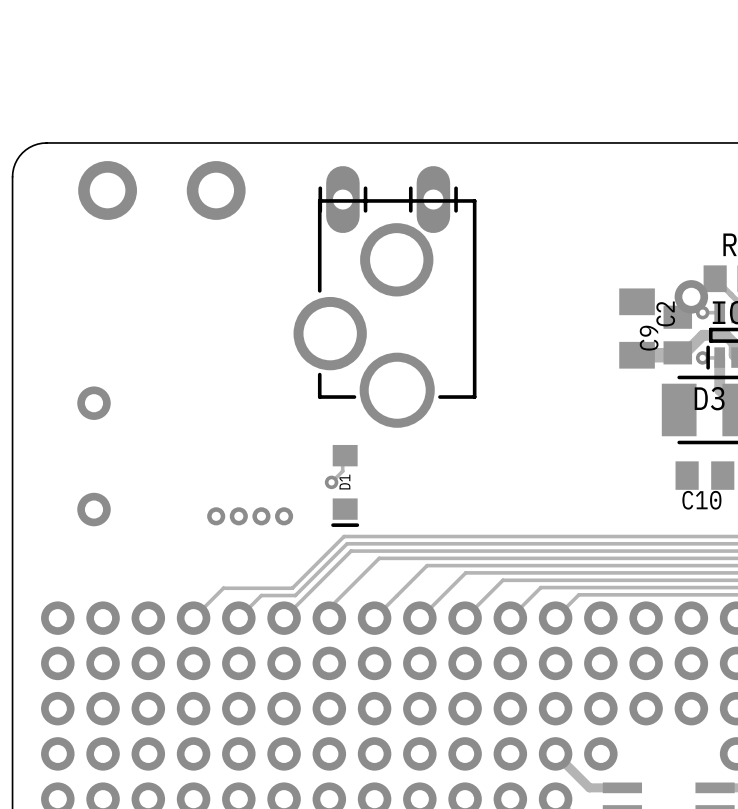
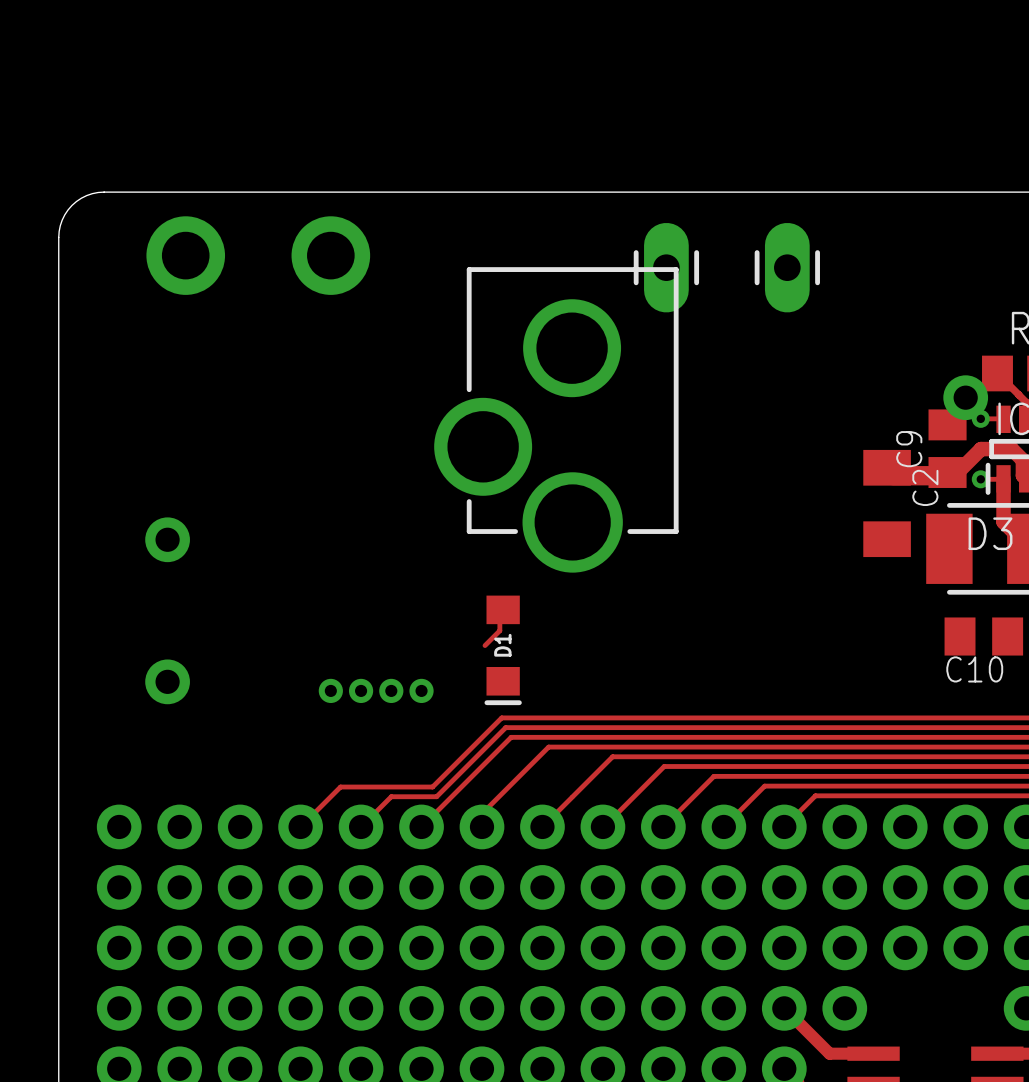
part: (342, 199) -> none
part position: (433, 199) -> (666, 267)
part: none -> (787, 267)
C2 position: (637, 328) -> (887, 503)
via: (331, 482) -> none

